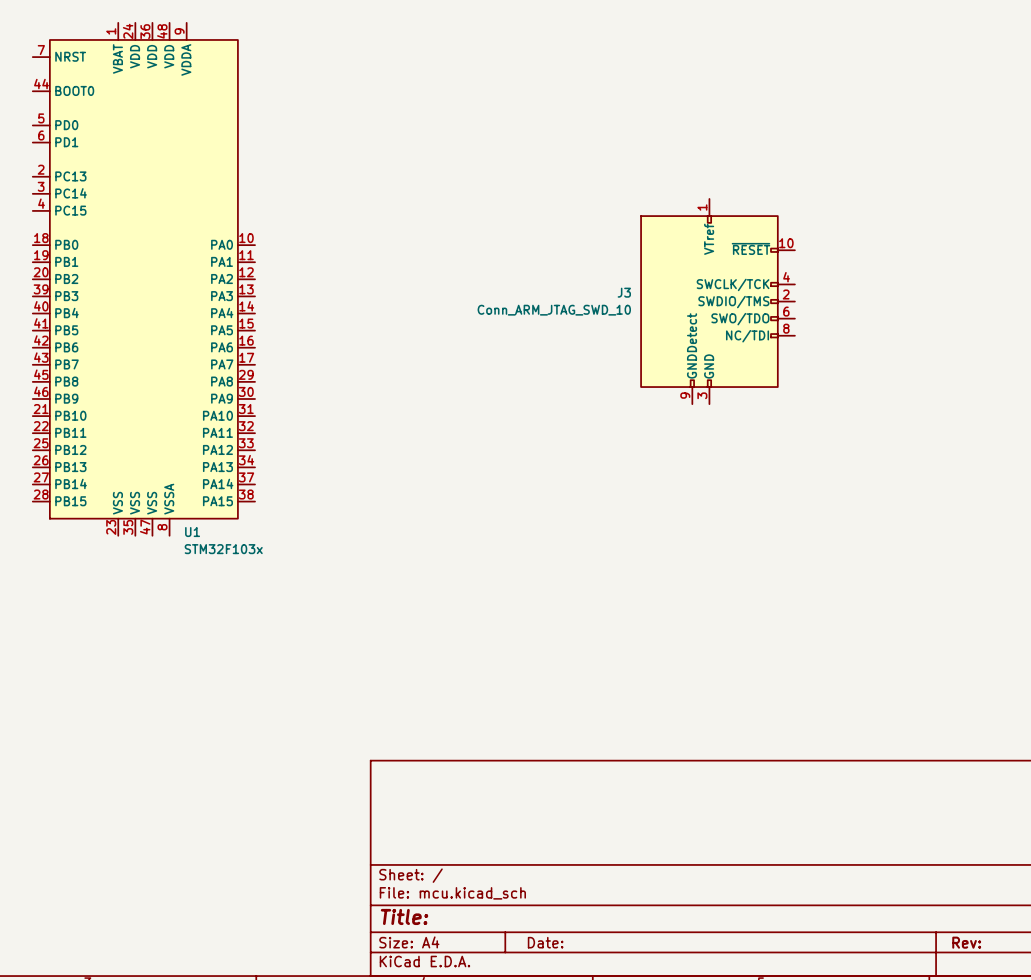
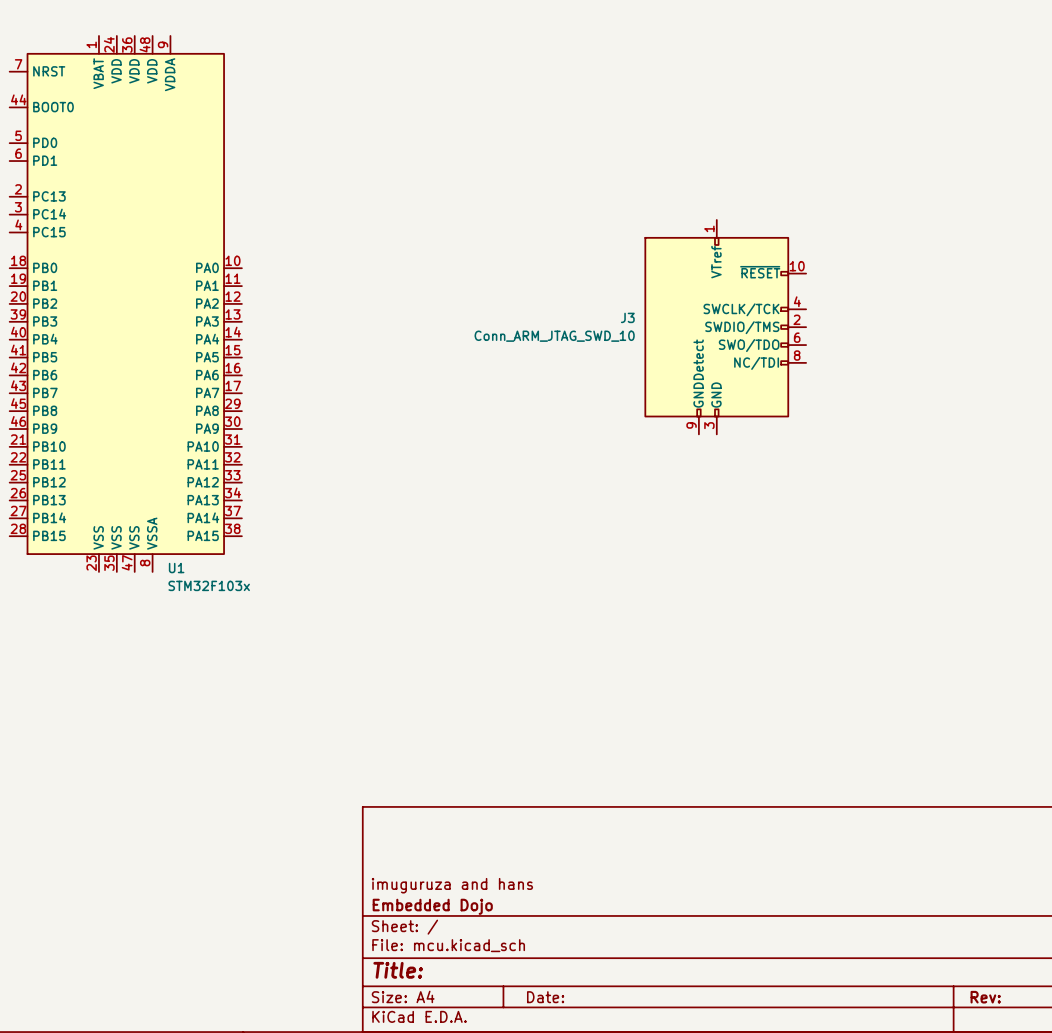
title block: none -> imuguruza and hans (452, 885)
title block: none -> Embedded Dojo (432, 906)

